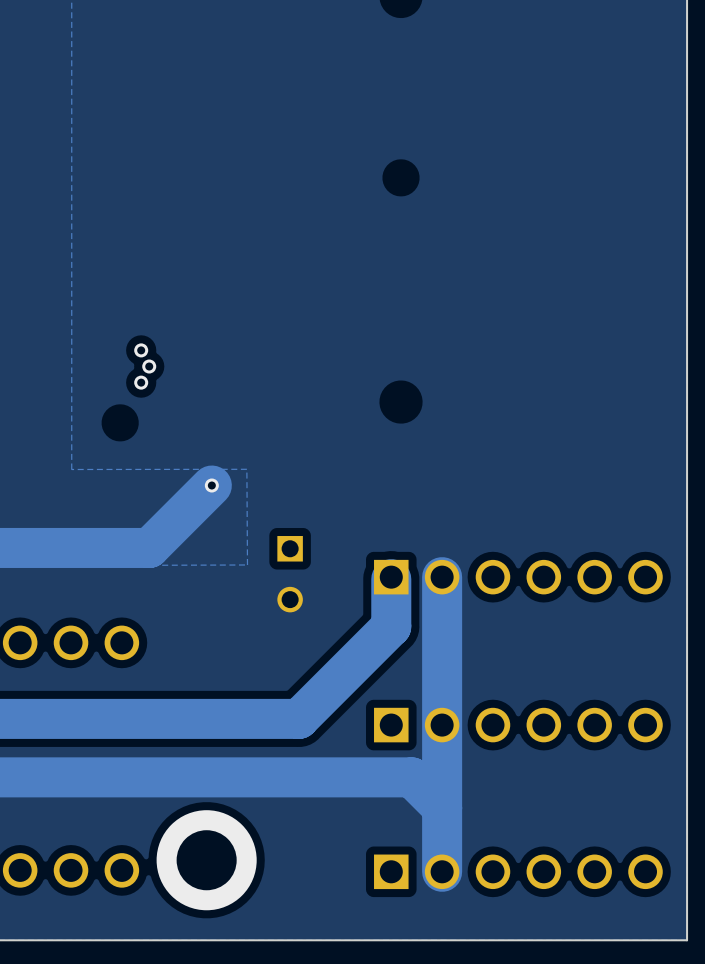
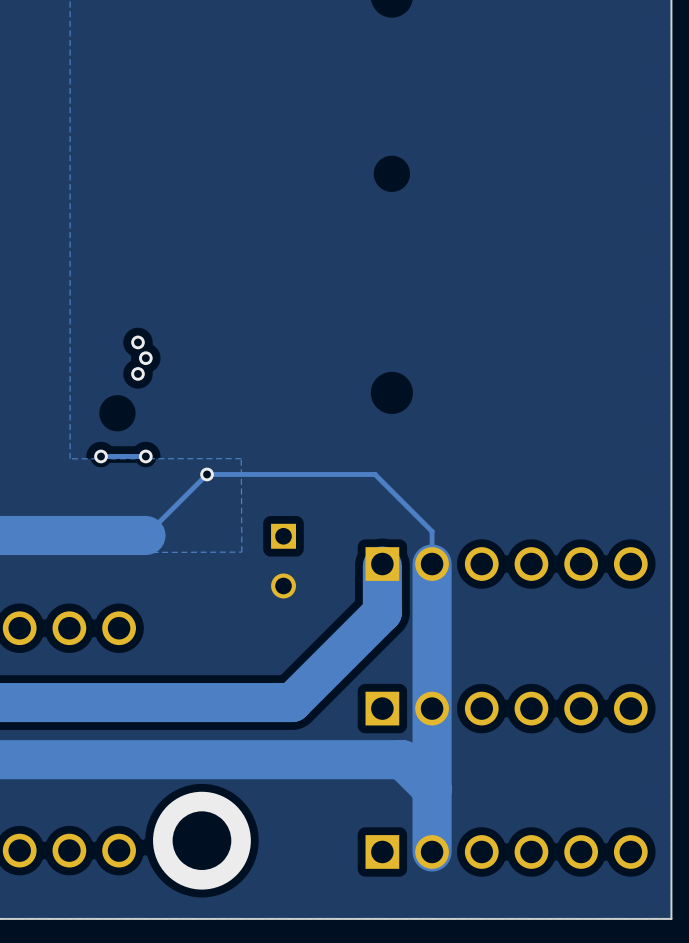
via: none -> (101, 456)
track: none -> (145, 456) (101, 456)
via: none -> (145, 456)
track: none -> (207, 474) (375, 474) (432, 531) (432, 564)
track width: thick (211, 485) (149, 547) -> thin (207, 474) (146, 535)

